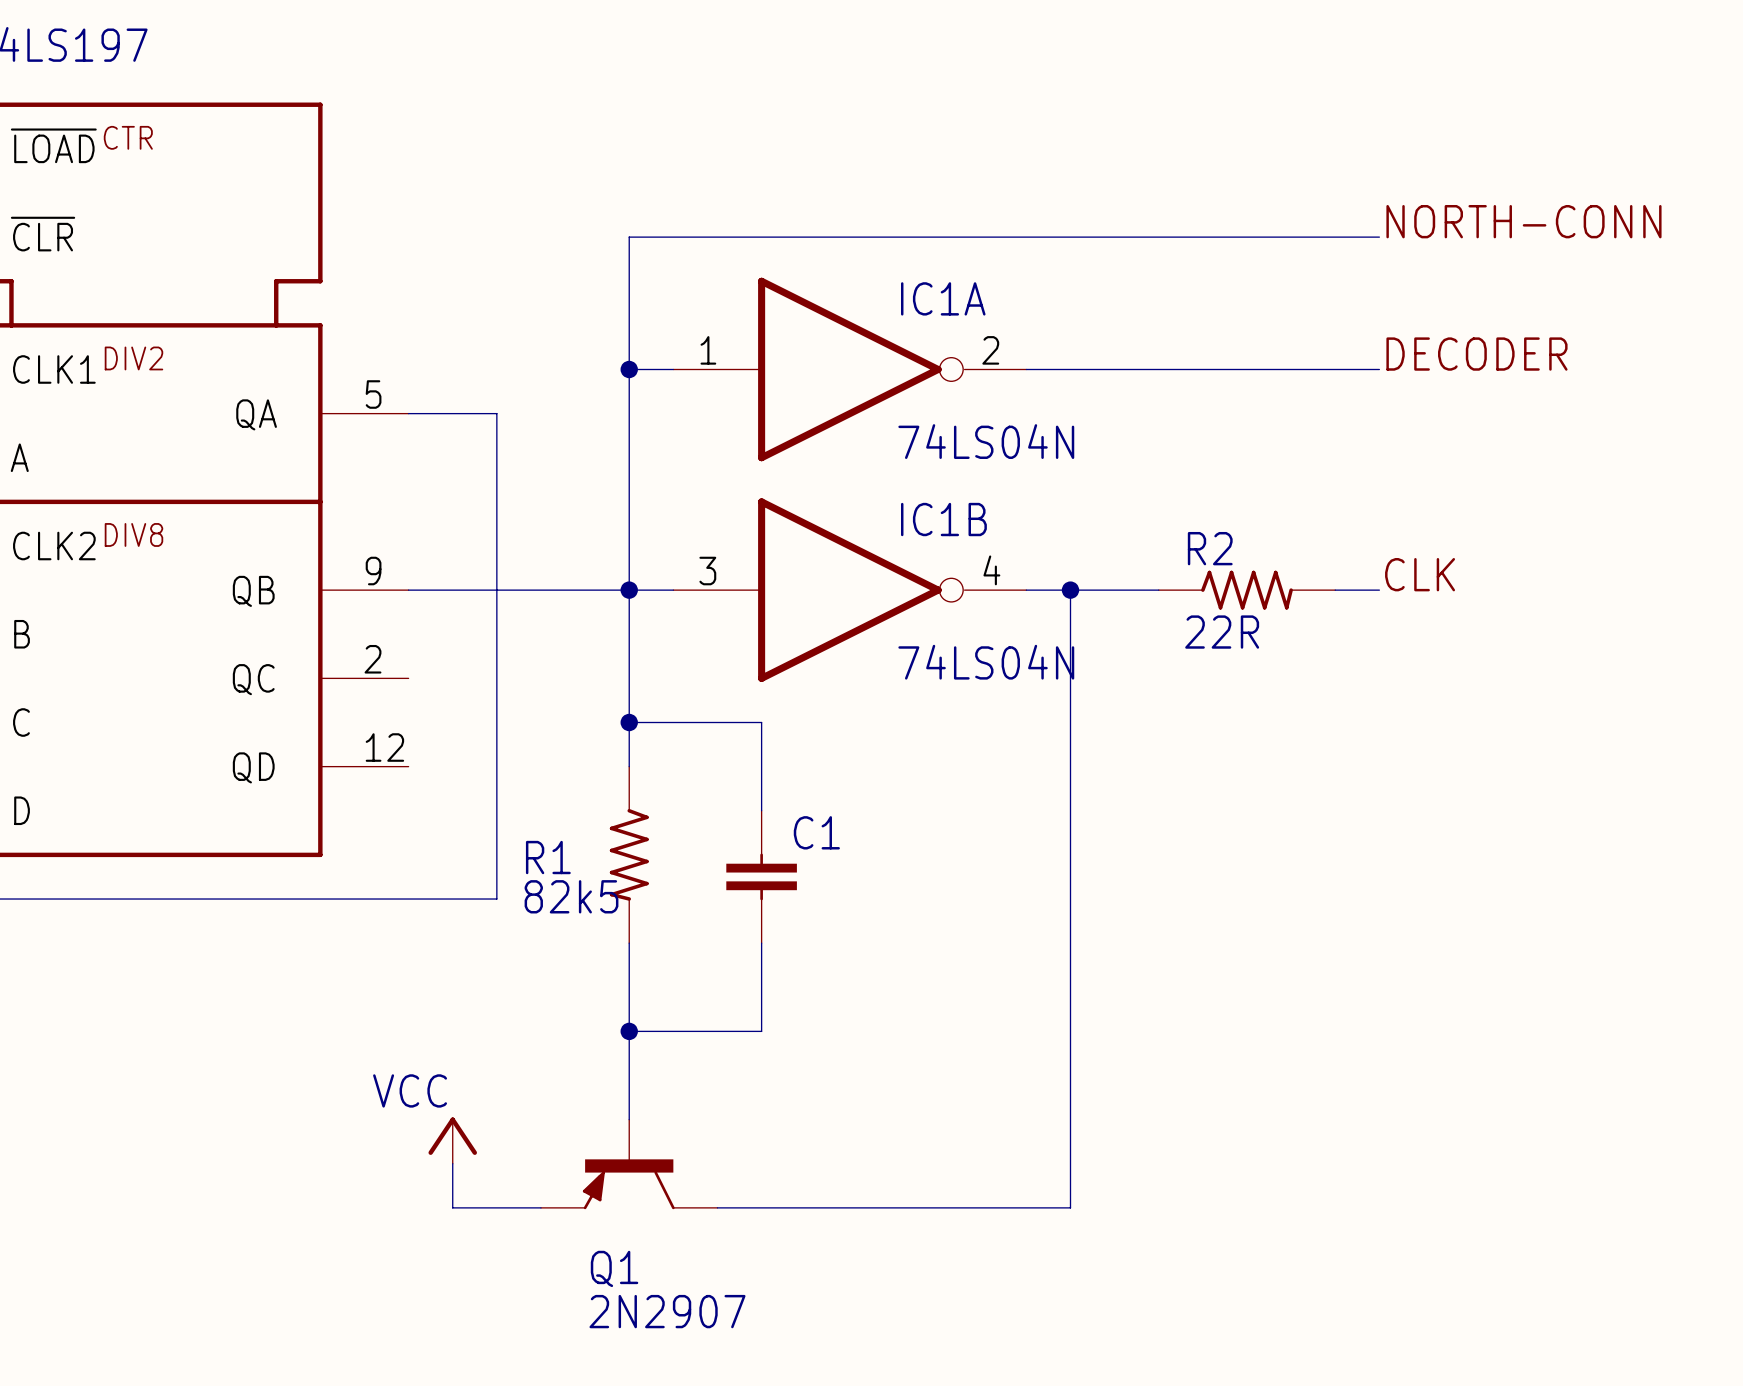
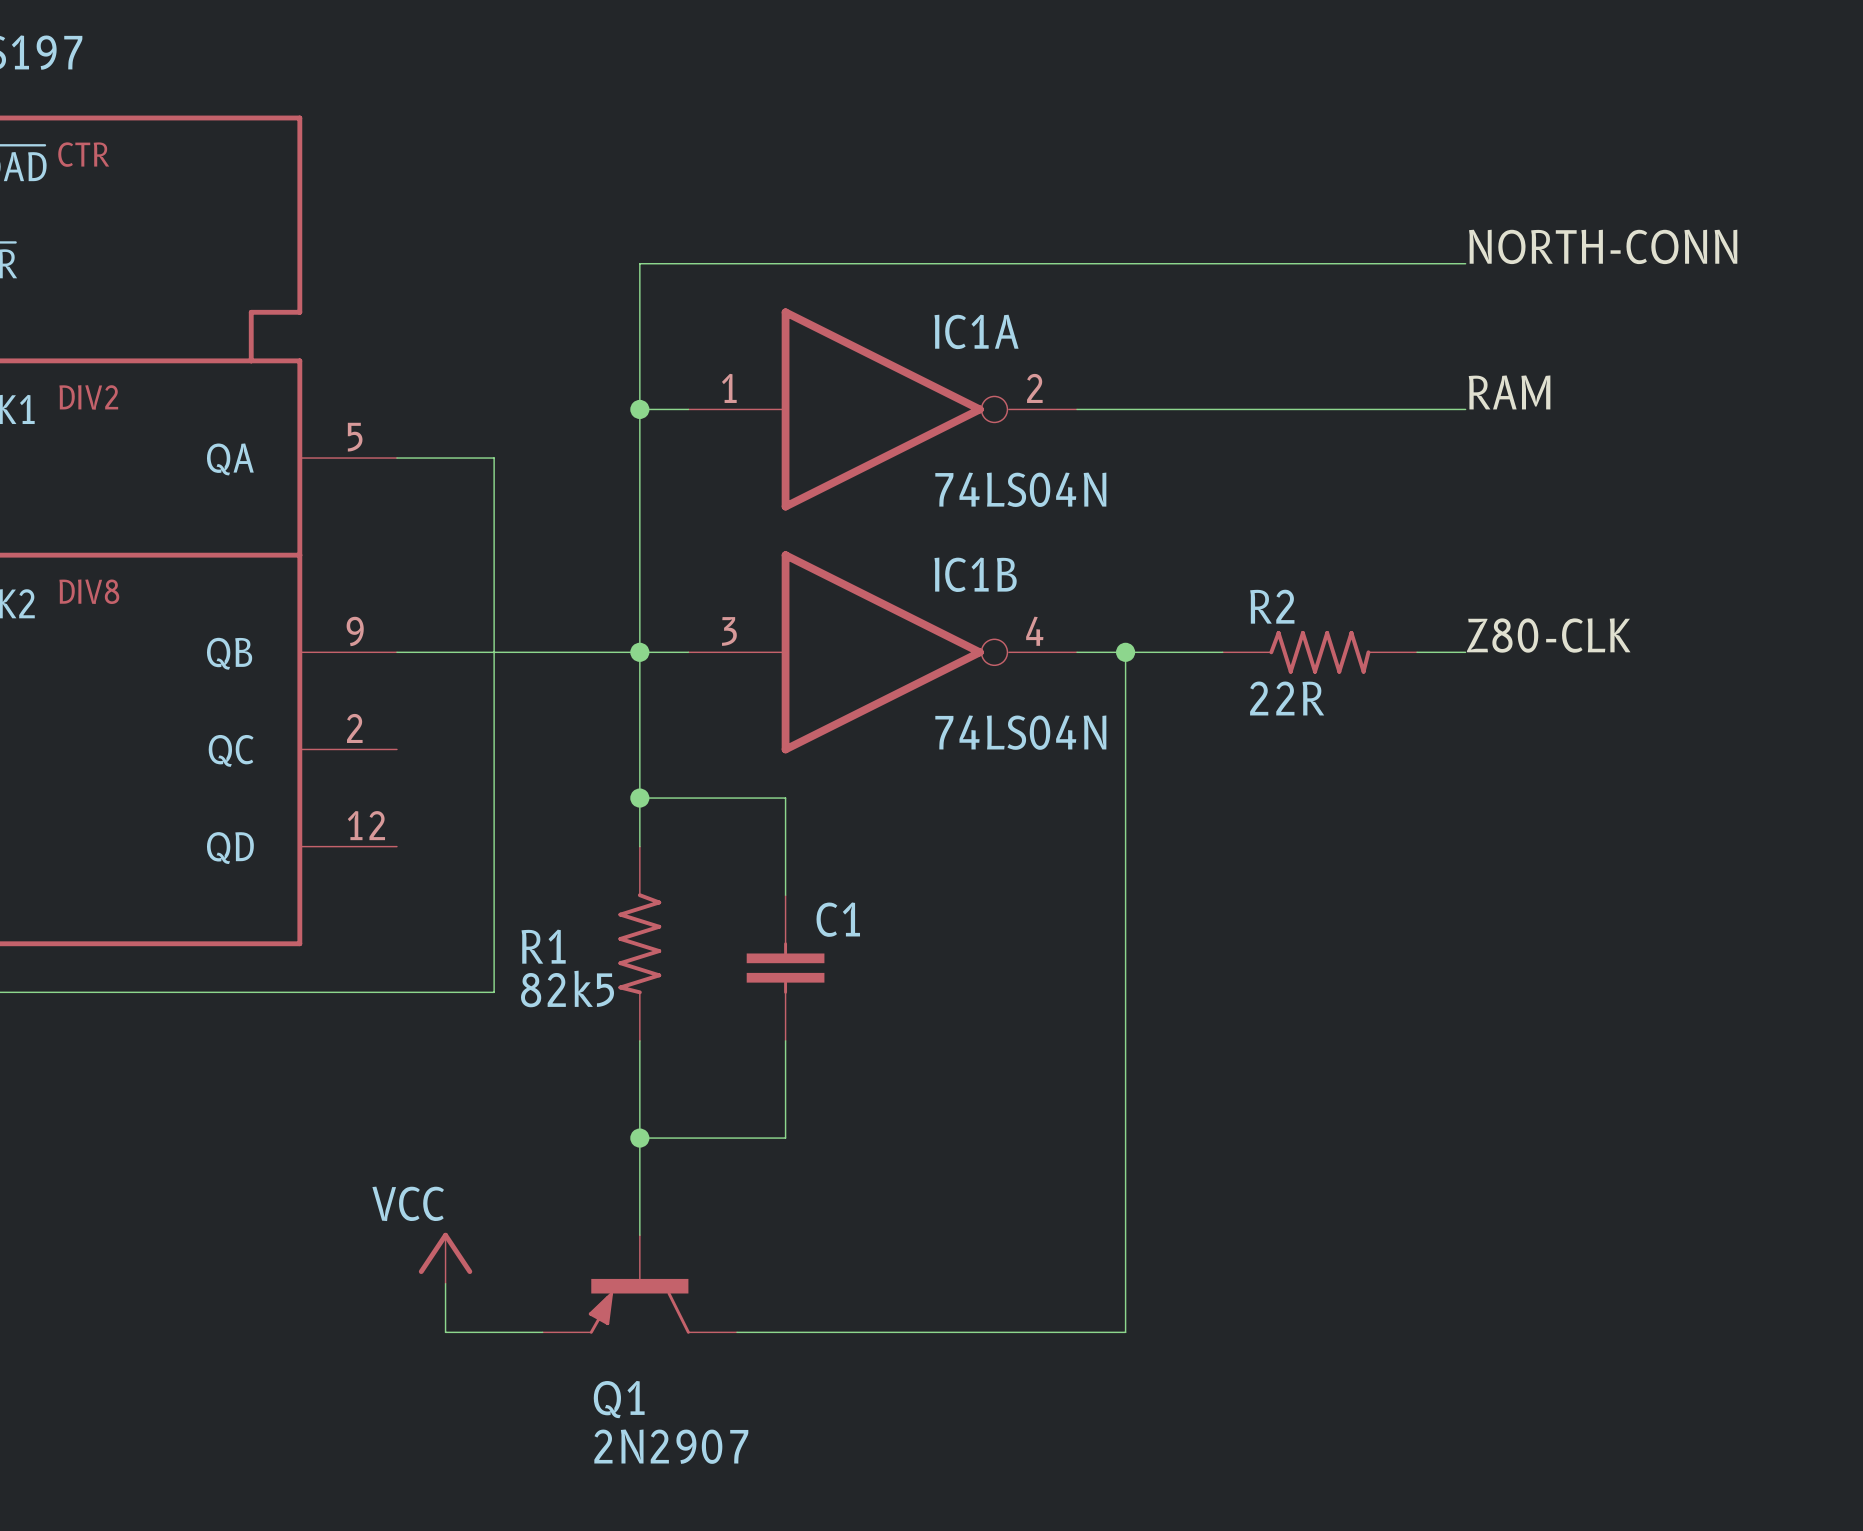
label: DECODER (1476, 354) -> RAM (1509, 392)
label: CLK (1420, 574) -> Z80-CLK (1548, 635)

